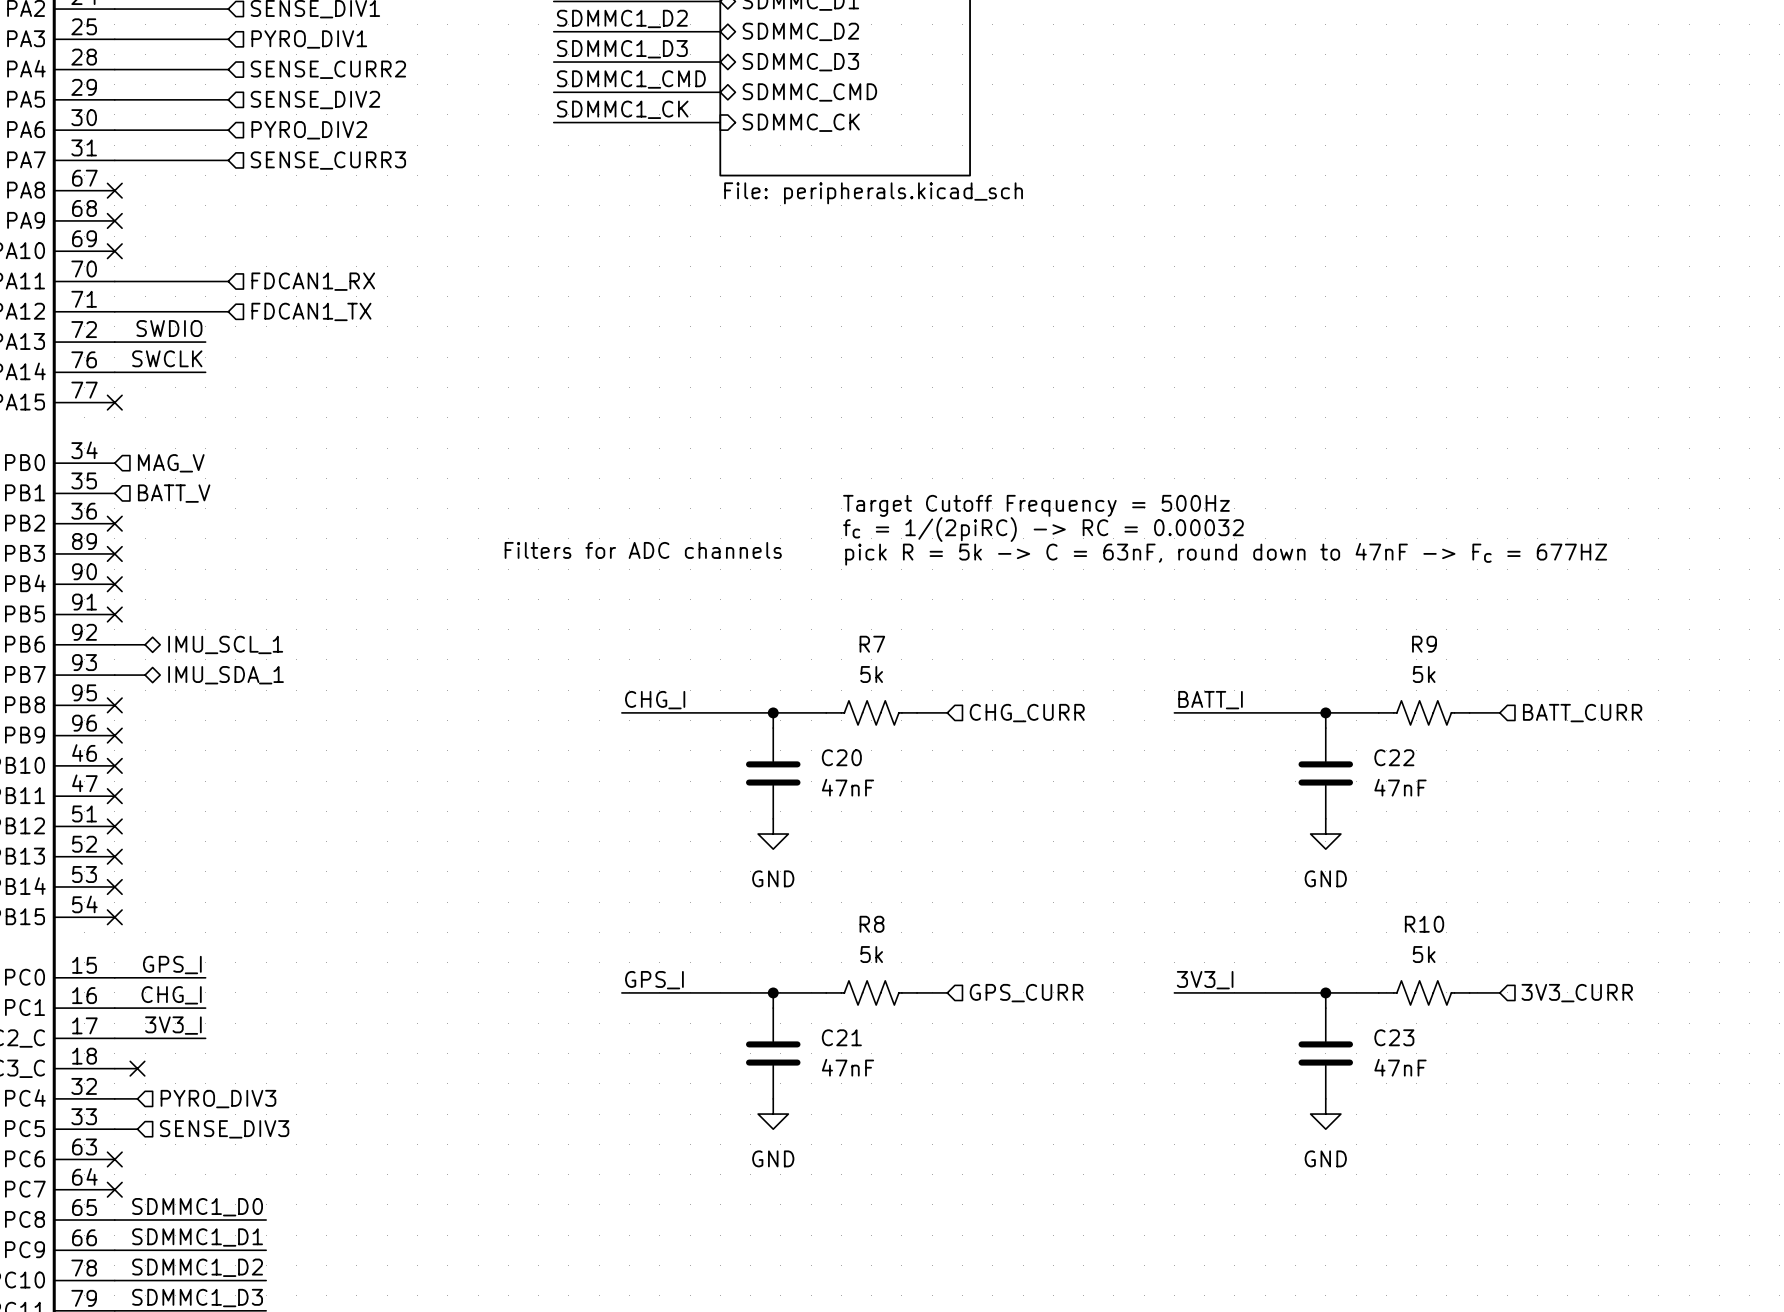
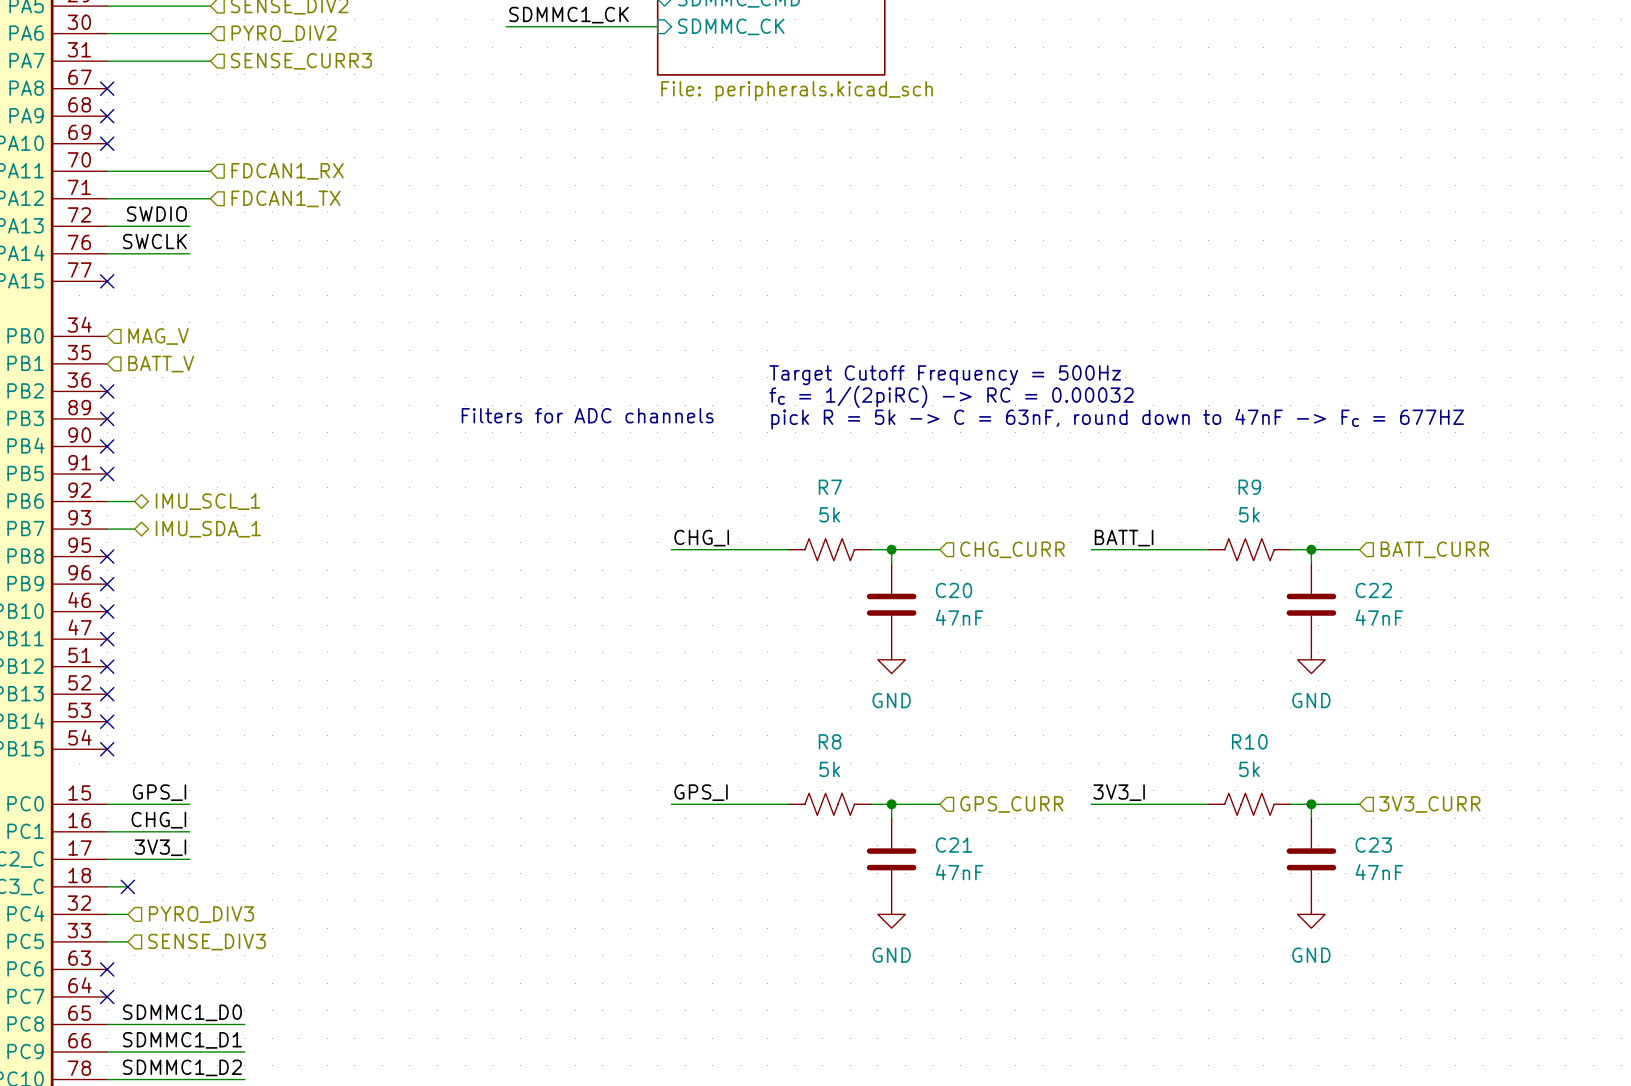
wire: none -> (671, 549) (788, 549)
wire: none -> (871, 549) (939, 549)
junction: none -> (891, 549)
wire: none -> (1091, 549) (1208, 549)
wire: none -> (1290, 549) (1359, 549)
junction: none -> (1311, 549)
label position: CHG_I (655, 700) -> CHG_I (701, 538)
label position: BATT_I (1210, 700) -> BATT_I (1124, 538)
wire: (621, 712) (826, 712) -> none
wire: (773, 712) (773, 728) -> (891, 549) (891, 563)
junction: (773, 712) -> none
R7 position: (871, 712) -> (829, 549)
wire: (917, 712) (947, 712) -> none
wire: (1174, 712) (1378, 712) -> none
wire: (1325, 712) (1325, 728) -> (1311, 549) (1311, 563)
junction: (1325, 712) -> none
R9 position: (1424, 712) -> (1249, 549)
wire: (1469, 712) (1499, 712) -> none
hierarchical label position: CHG_CURR (1027, 713) -> CHG_CURR (1012, 549)
hierarchical label position: BATT_CURR (1582, 713) -> BATT_CURR (1434, 549)
C20 position: (773, 773) -> (891, 604)
C22 position: (1325, 773) -> (1311, 604)
power symbol: none -> GND (891, 659)
power symbol: GND (773, 834) -> none
power symbol position: GND (1325, 834) -> GND (1311, 659)
wire: none -> (671, 804) (788, 804)
wire: none -> (871, 804) (939, 804)
junction: none -> (891, 804)
wire: none -> (1091, 804) (1208, 804)
wire: none -> (1290, 804) (1359, 804)
junction: none -> (1311, 804)
label position: GPS_I (654, 980) -> GPS_I (701, 792)
label position: 3V3_I (1205, 980) -> 3V3_I (1119, 792)
wire: (621, 992) (826, 992) -> none
wire: (773, 992) (773, 1008) -> (891, 804) (891, 818)
junction: (773, 992) -> none
R8 position: (871, 992) -> (829, 804)
wire: (917, 992) (947, 992) -> none
wire: (1174, 992) (1378, 992) -> none
wire: (1325, 992) (1325, 1008) -> (1311, 804) (1311, 818)
junction: (1325, 992) -> none
R10 position: (1424, 992) -> (1249, 804)
wire: (1469, 992) (1499, 992) -> none
hierarchical label position: GPS_CURR (1026, 993) -> GPS_CURR (1011, 804)
hierarchical label position: 3V3_CURR (1577, 993) -> 3V3_CURR (1429, 804)
C21 position: (773, 1053) -> (891, 859)
C23 position: (1325, 1053) -> (1311, 859)
power symbol: none -> GND (891, 914)
power symbol: GND (773, 1114) -> none
power symbol position: GND (1325, 1114) -> GND (1311, 914)

